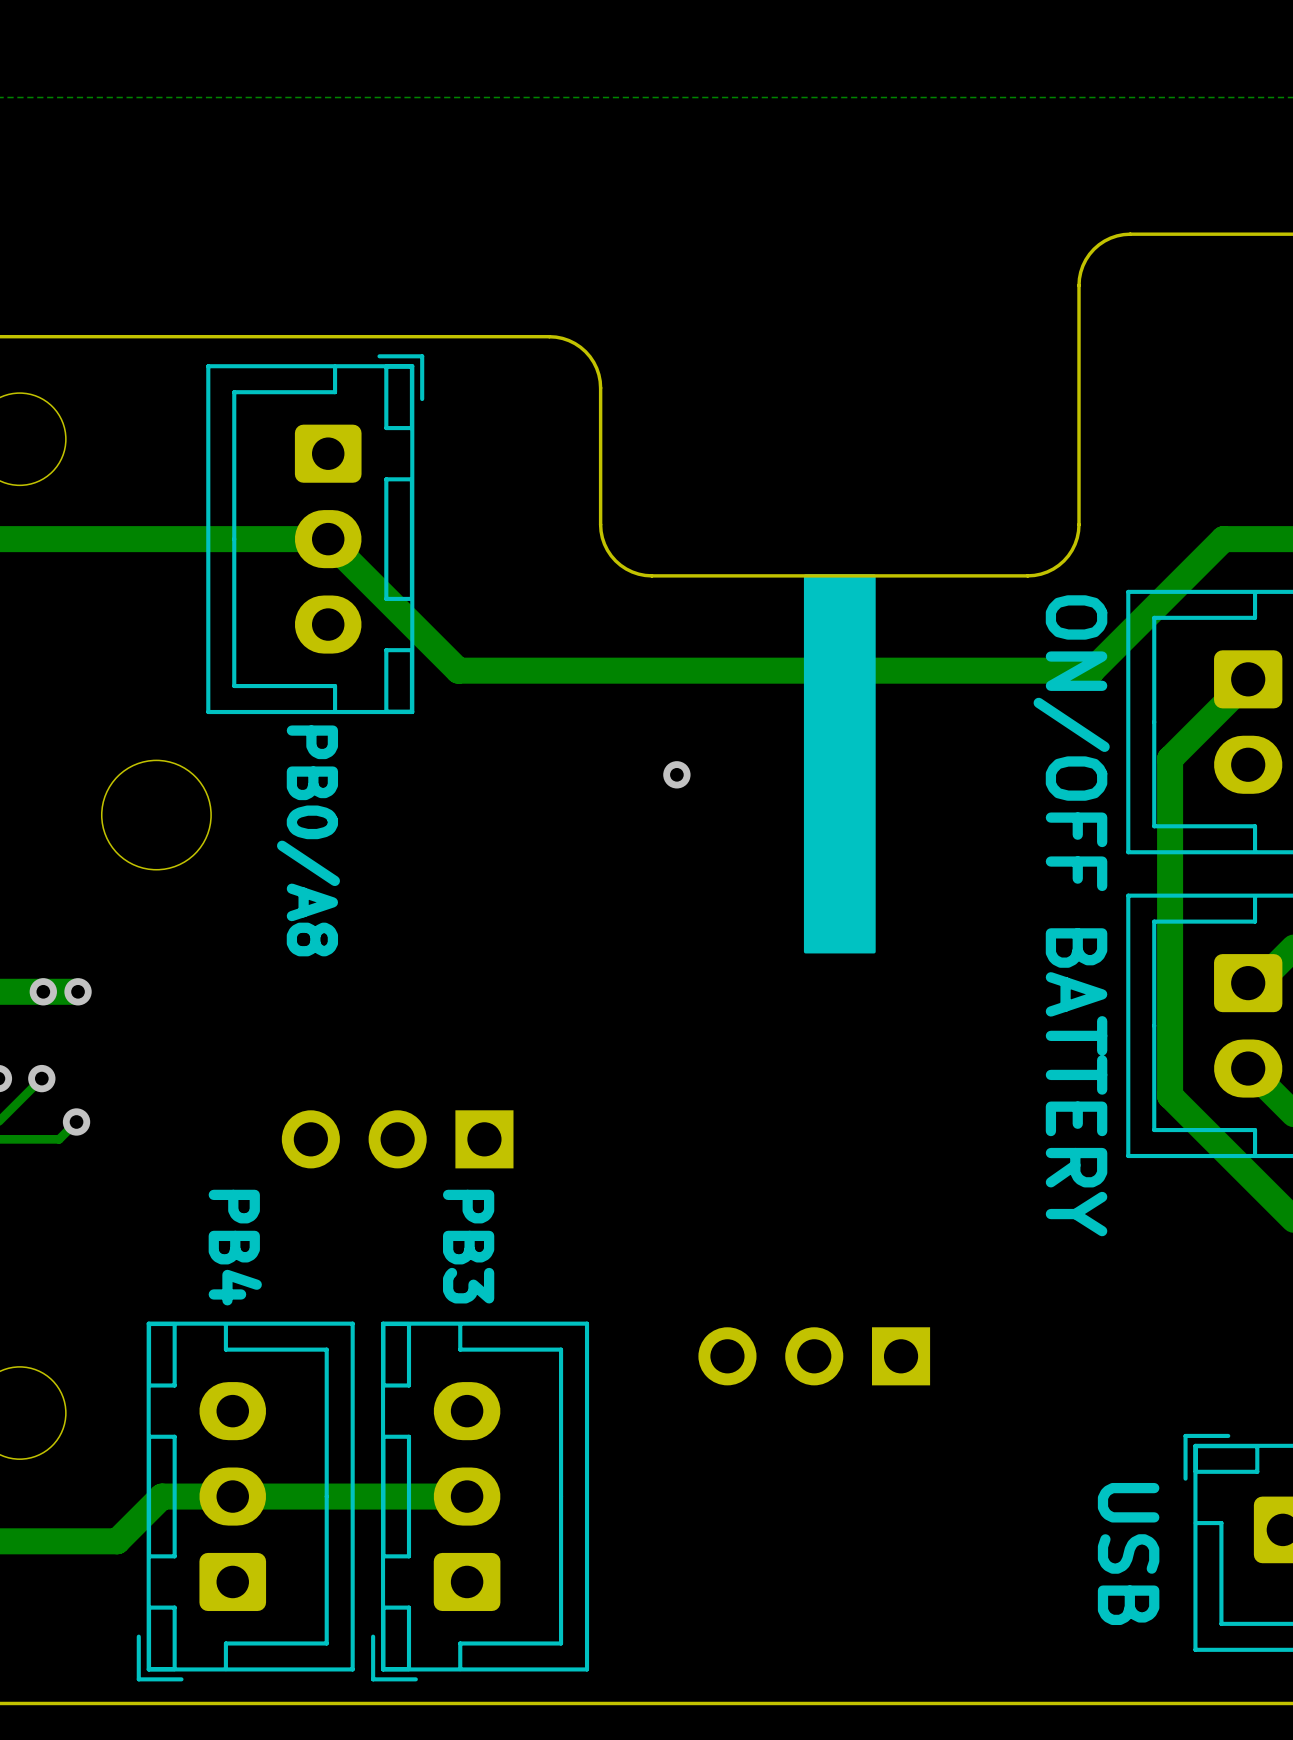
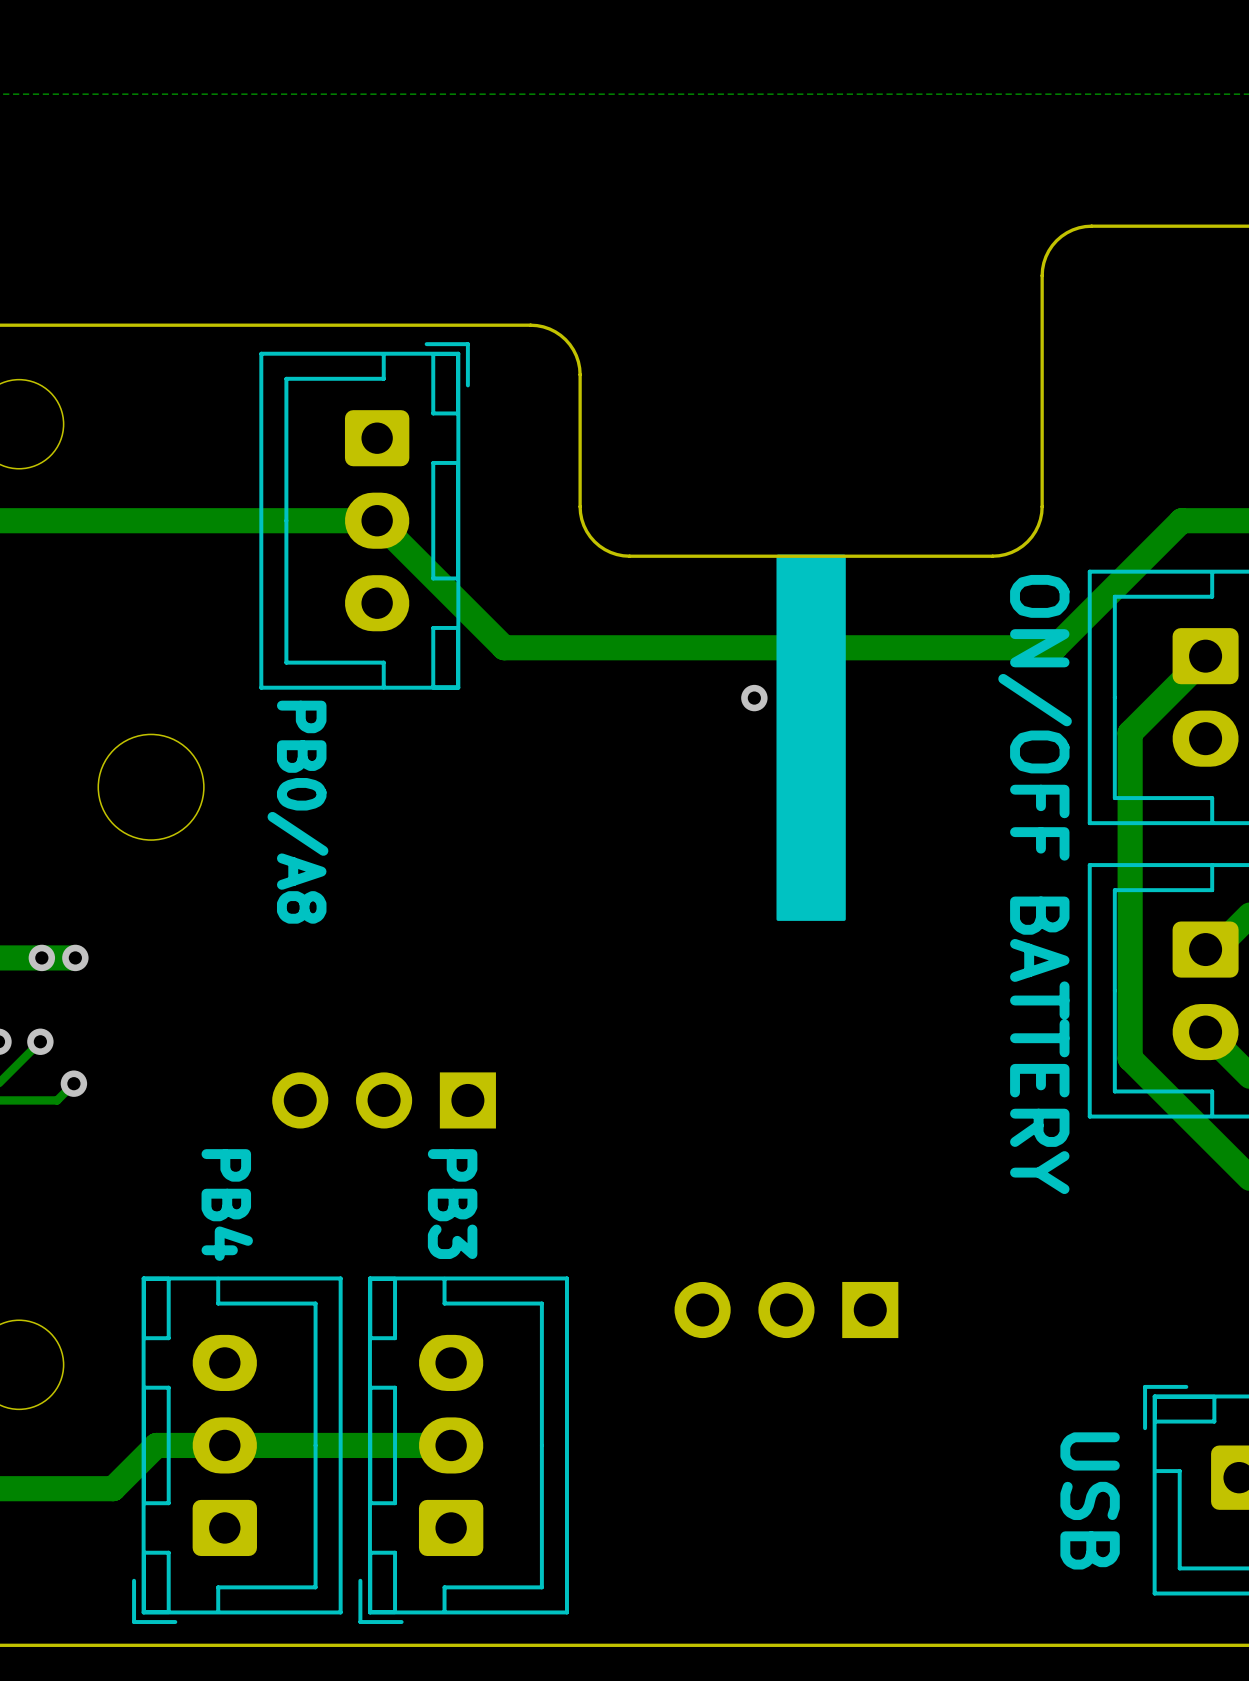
part position: (315, 534) -> (364, 515)
track: (328, 539) (458, 670) (522, 670) -> (317, 520) (377, 520) (504, 647)
via position: (676, 774) -> (754, 698)

